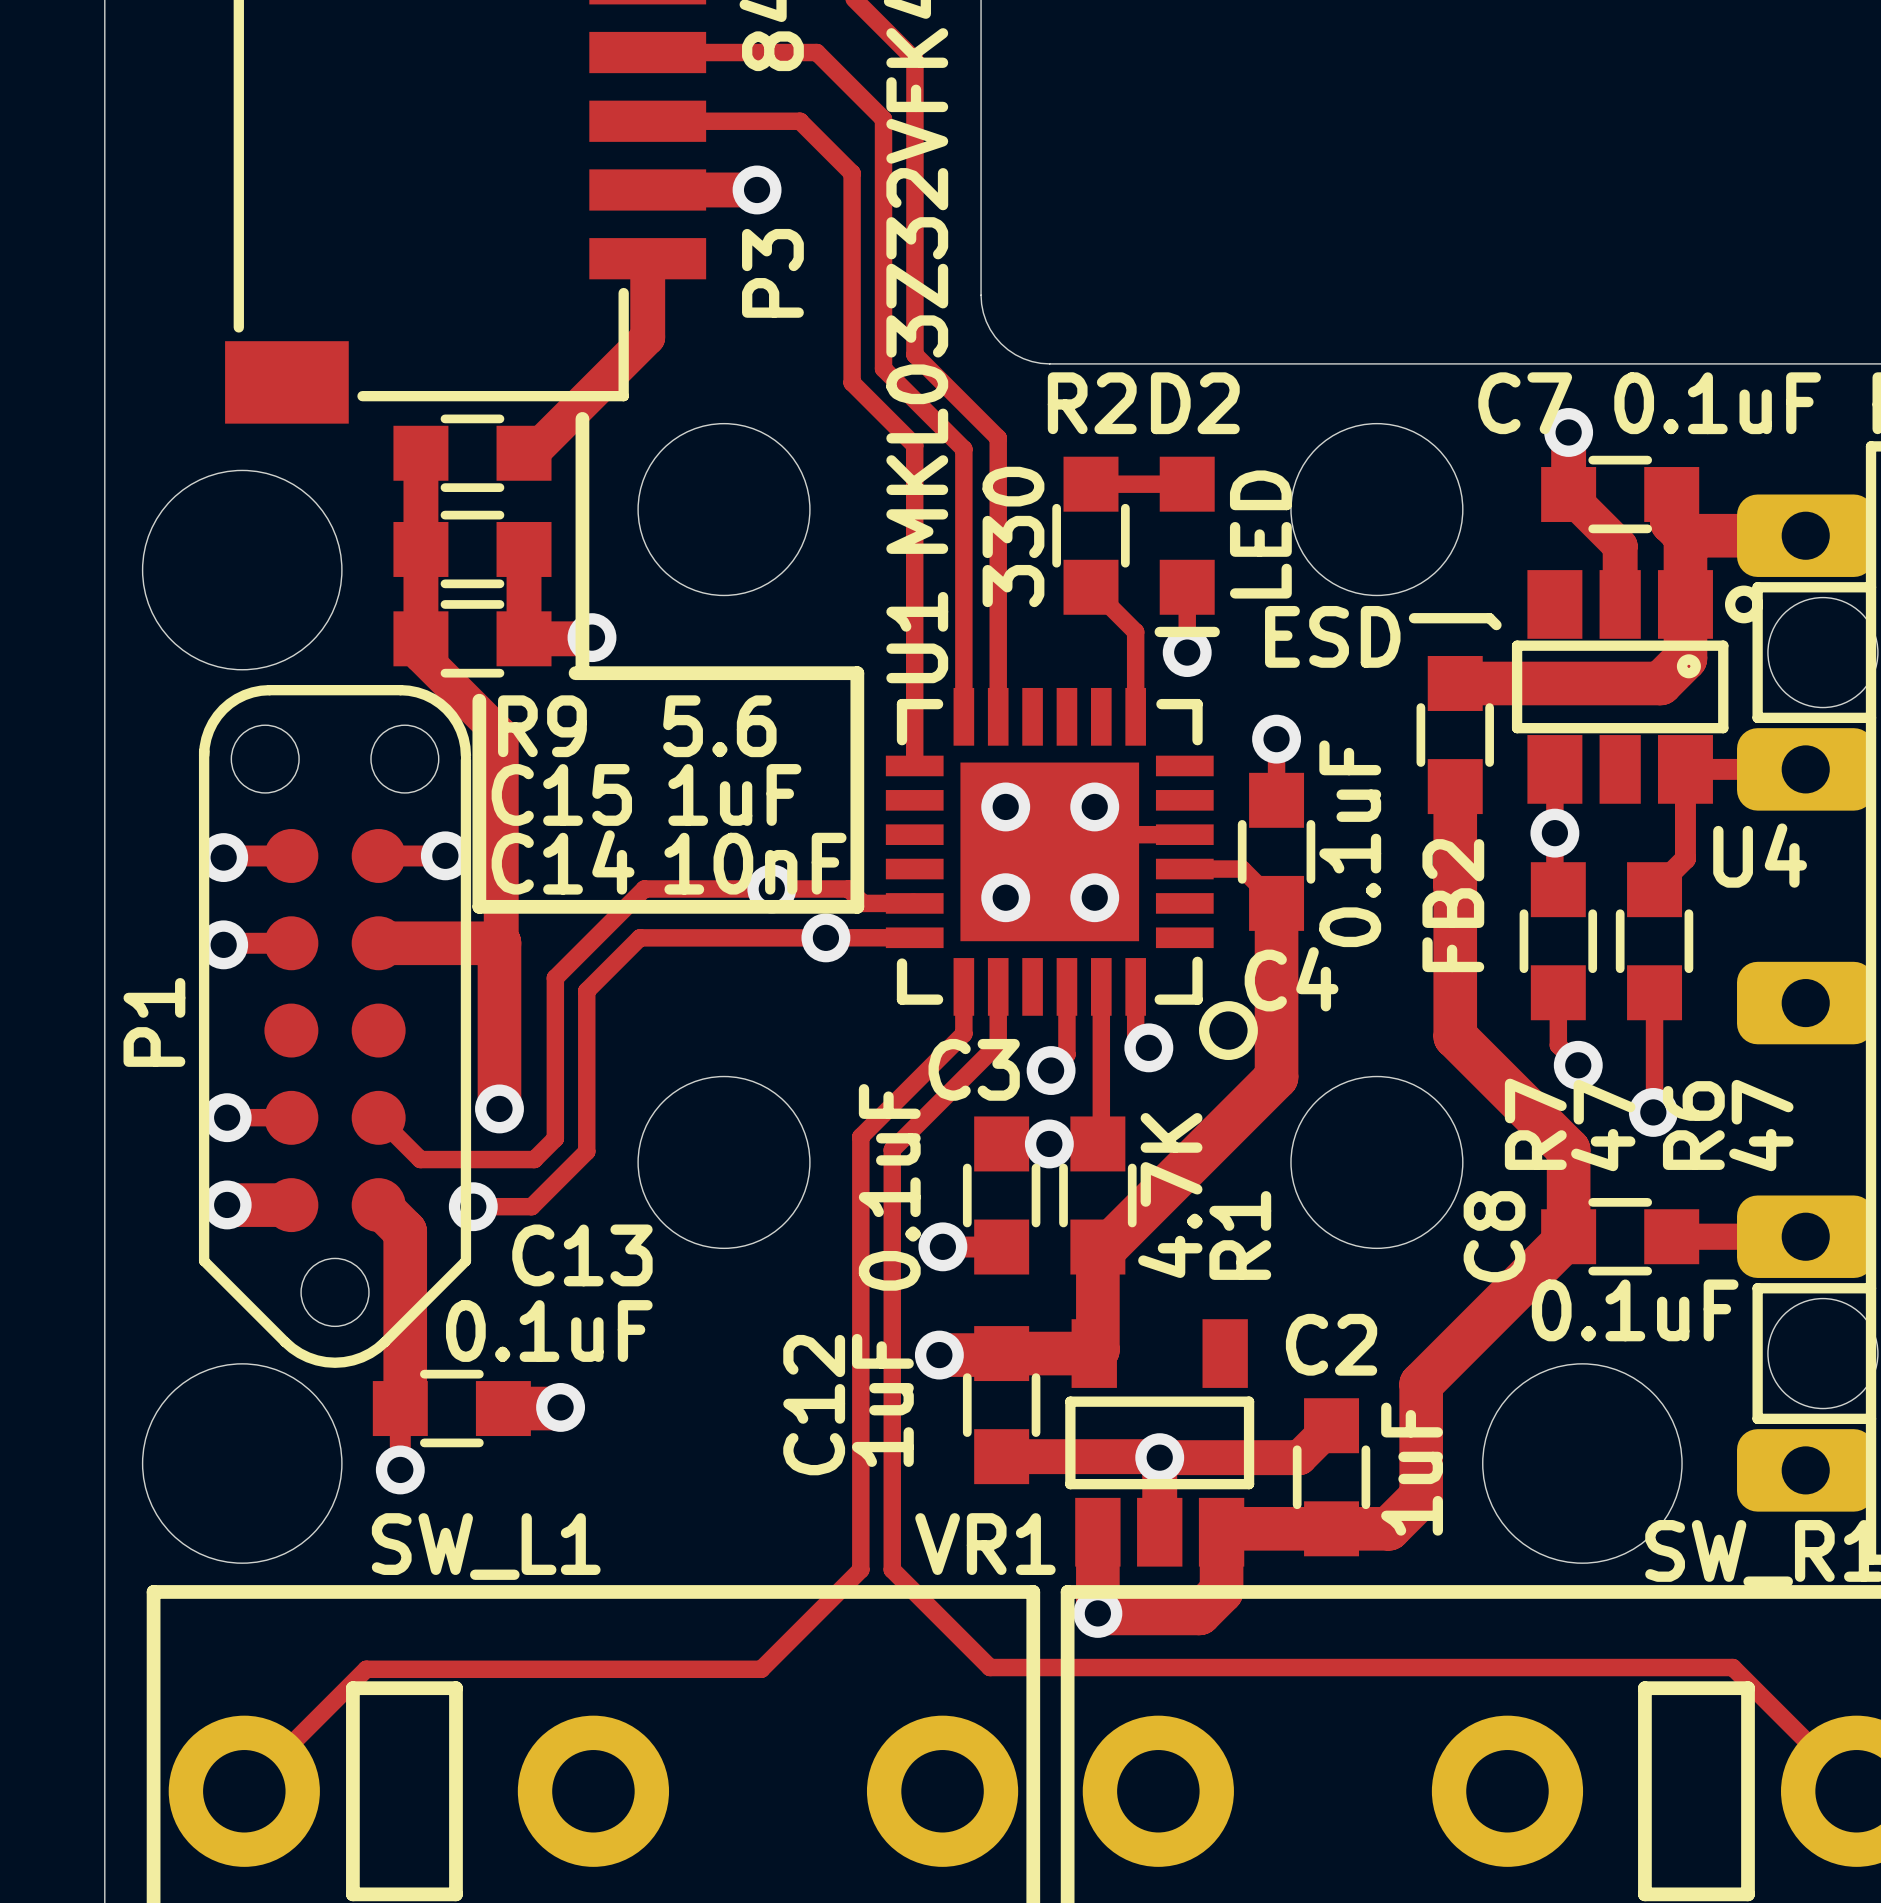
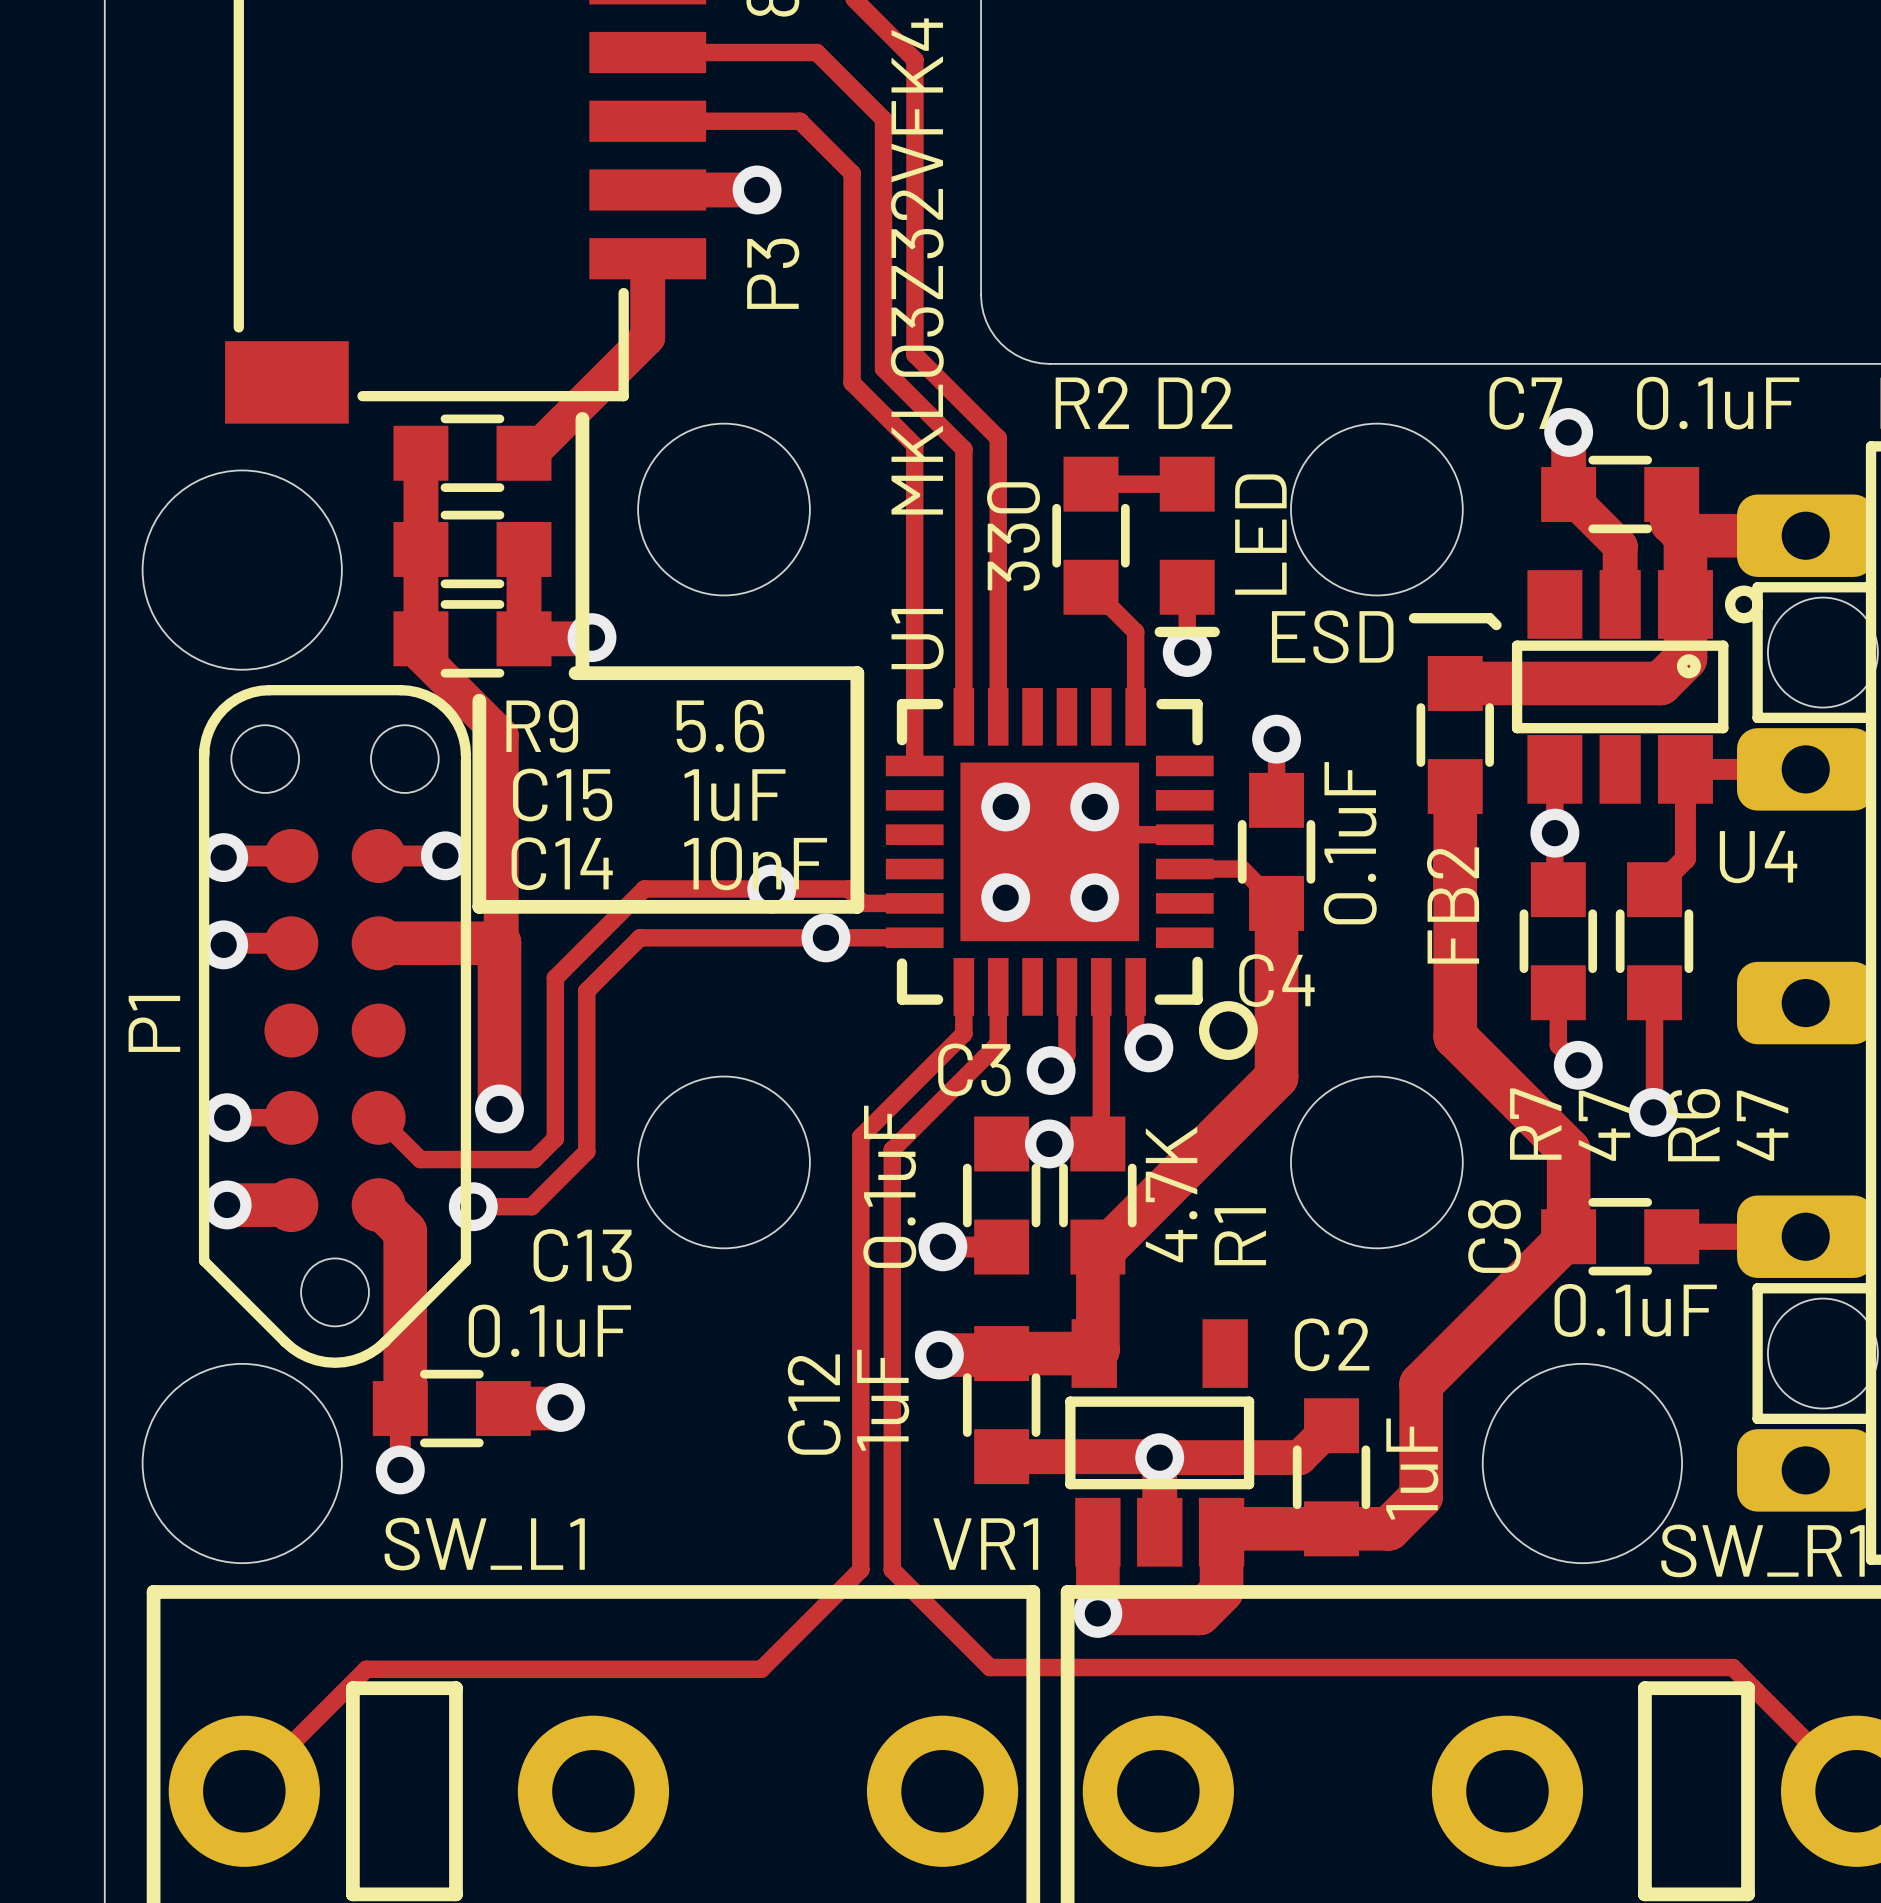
C4 name position: C4 (1291, 979) -> C4 (1276, 980)

